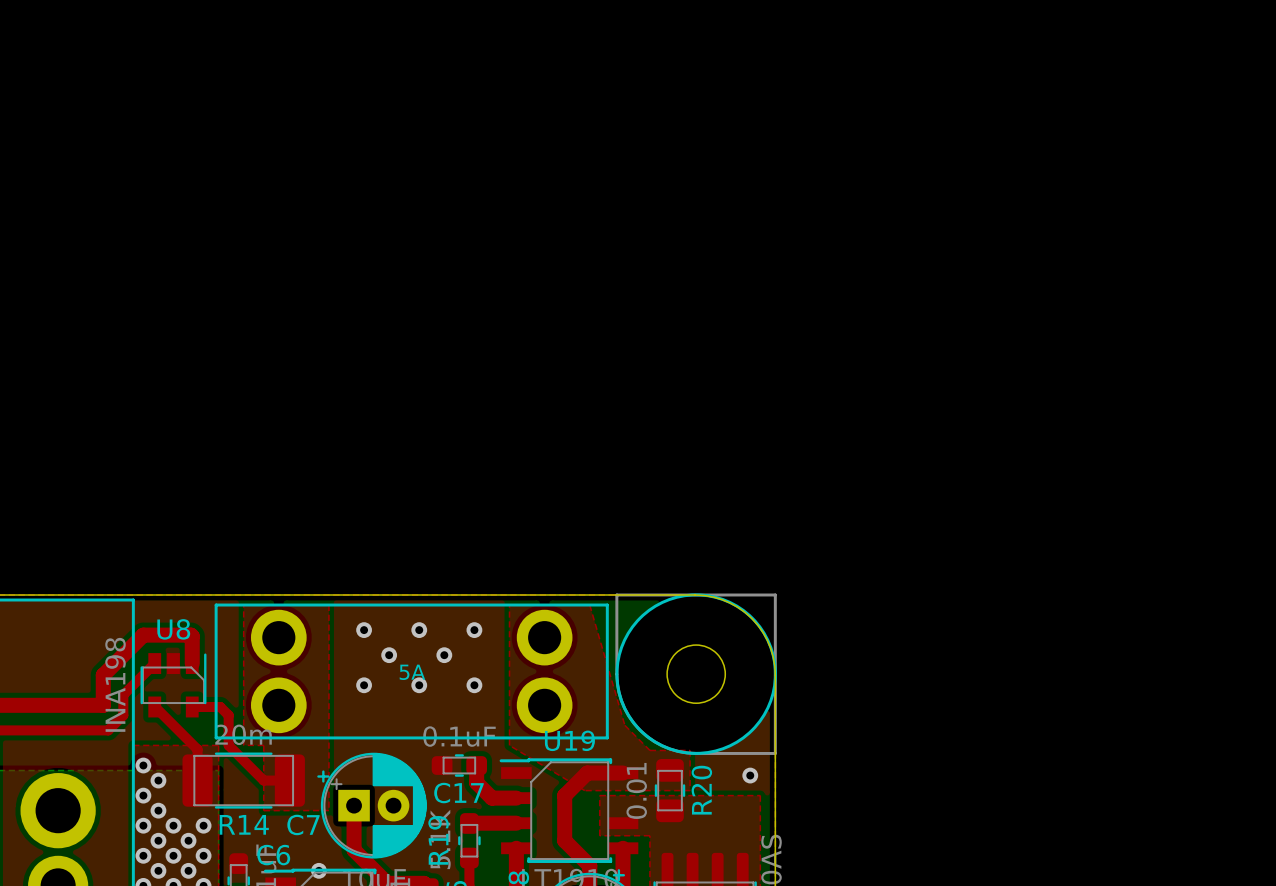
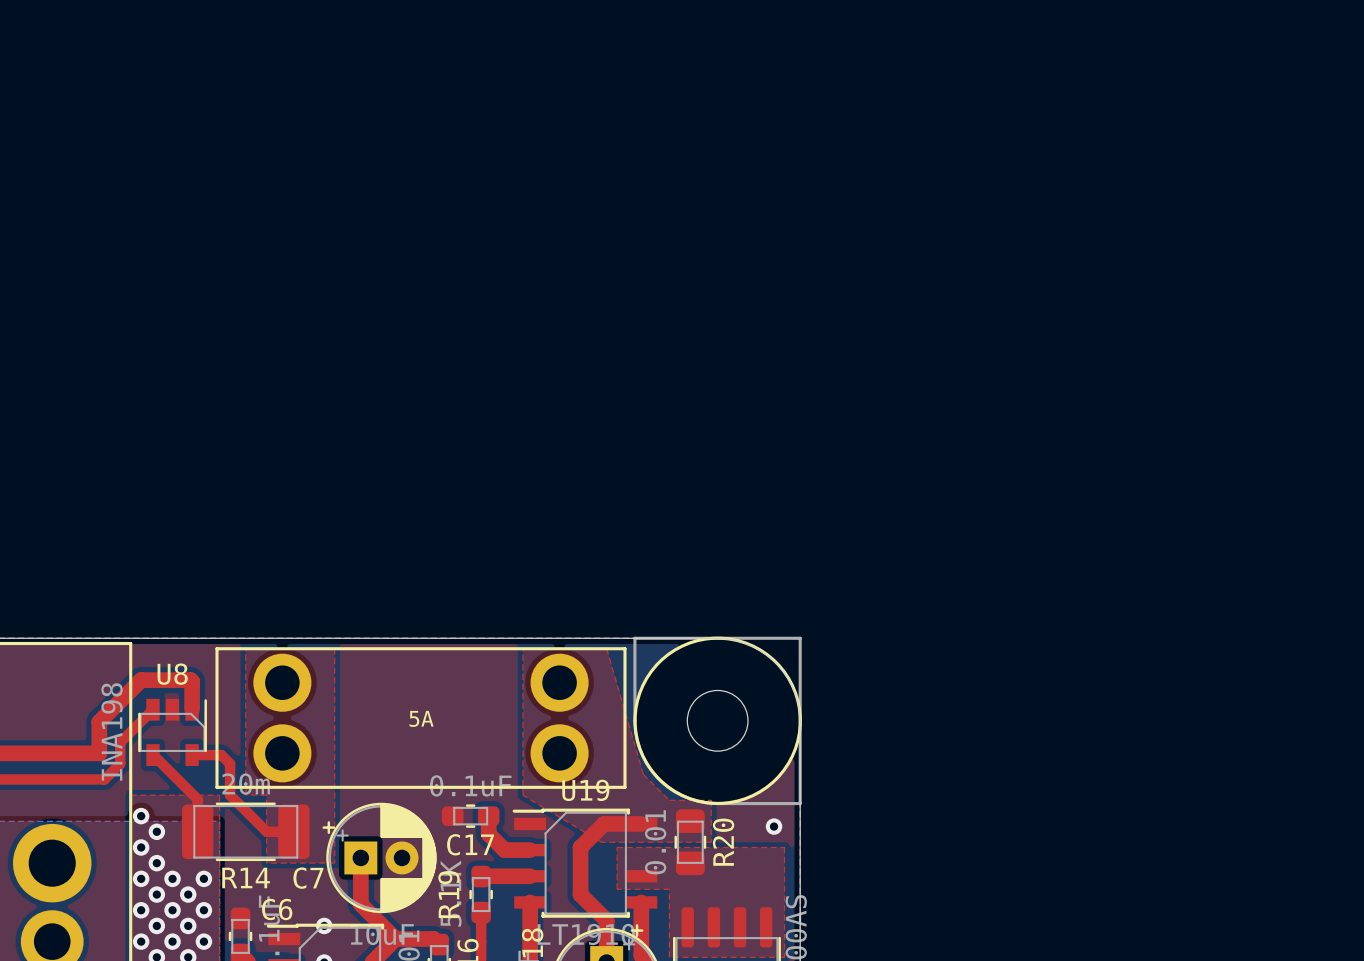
via: (364, 630) -> none
via: (419, 630) -> none
via: (474, 630) -> none
via: (389, 655) -> none
via: (444, 655) -> none
via: (364, 685) -> none
via: (419, 685) -> none
via: (474, 685) -> none

